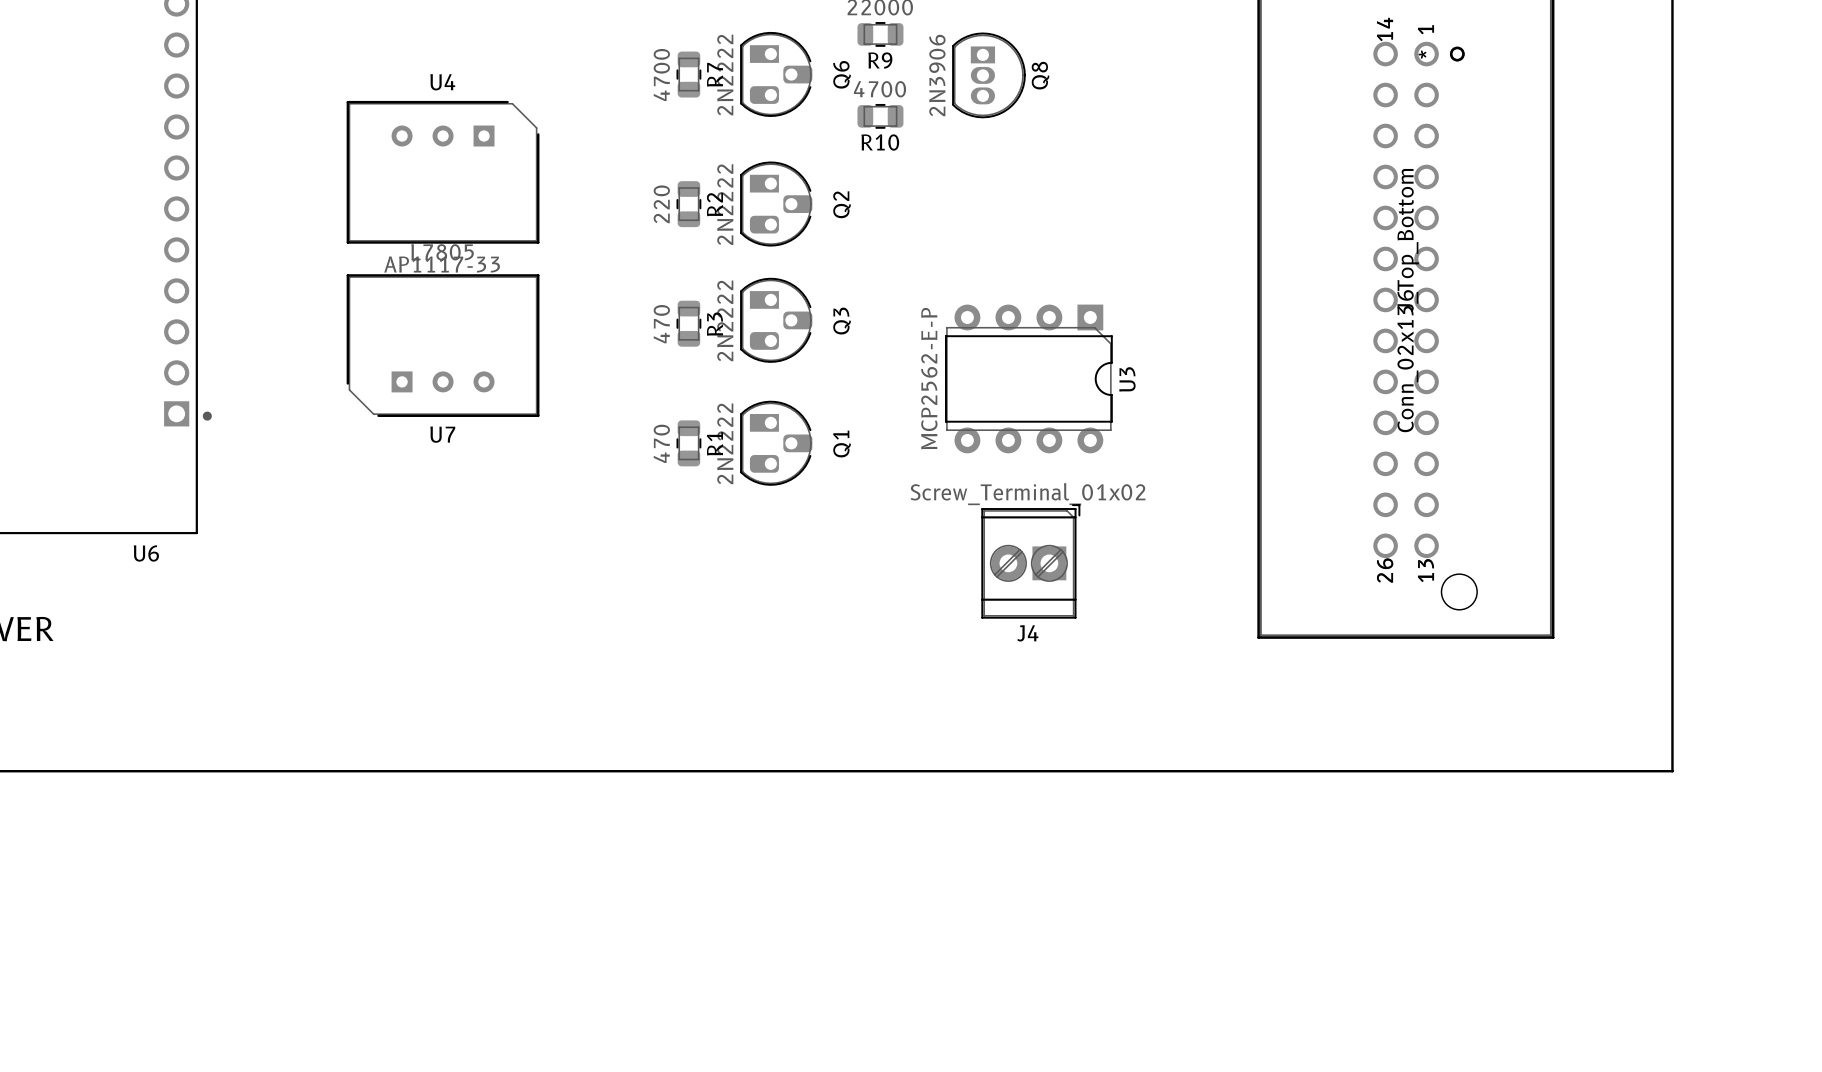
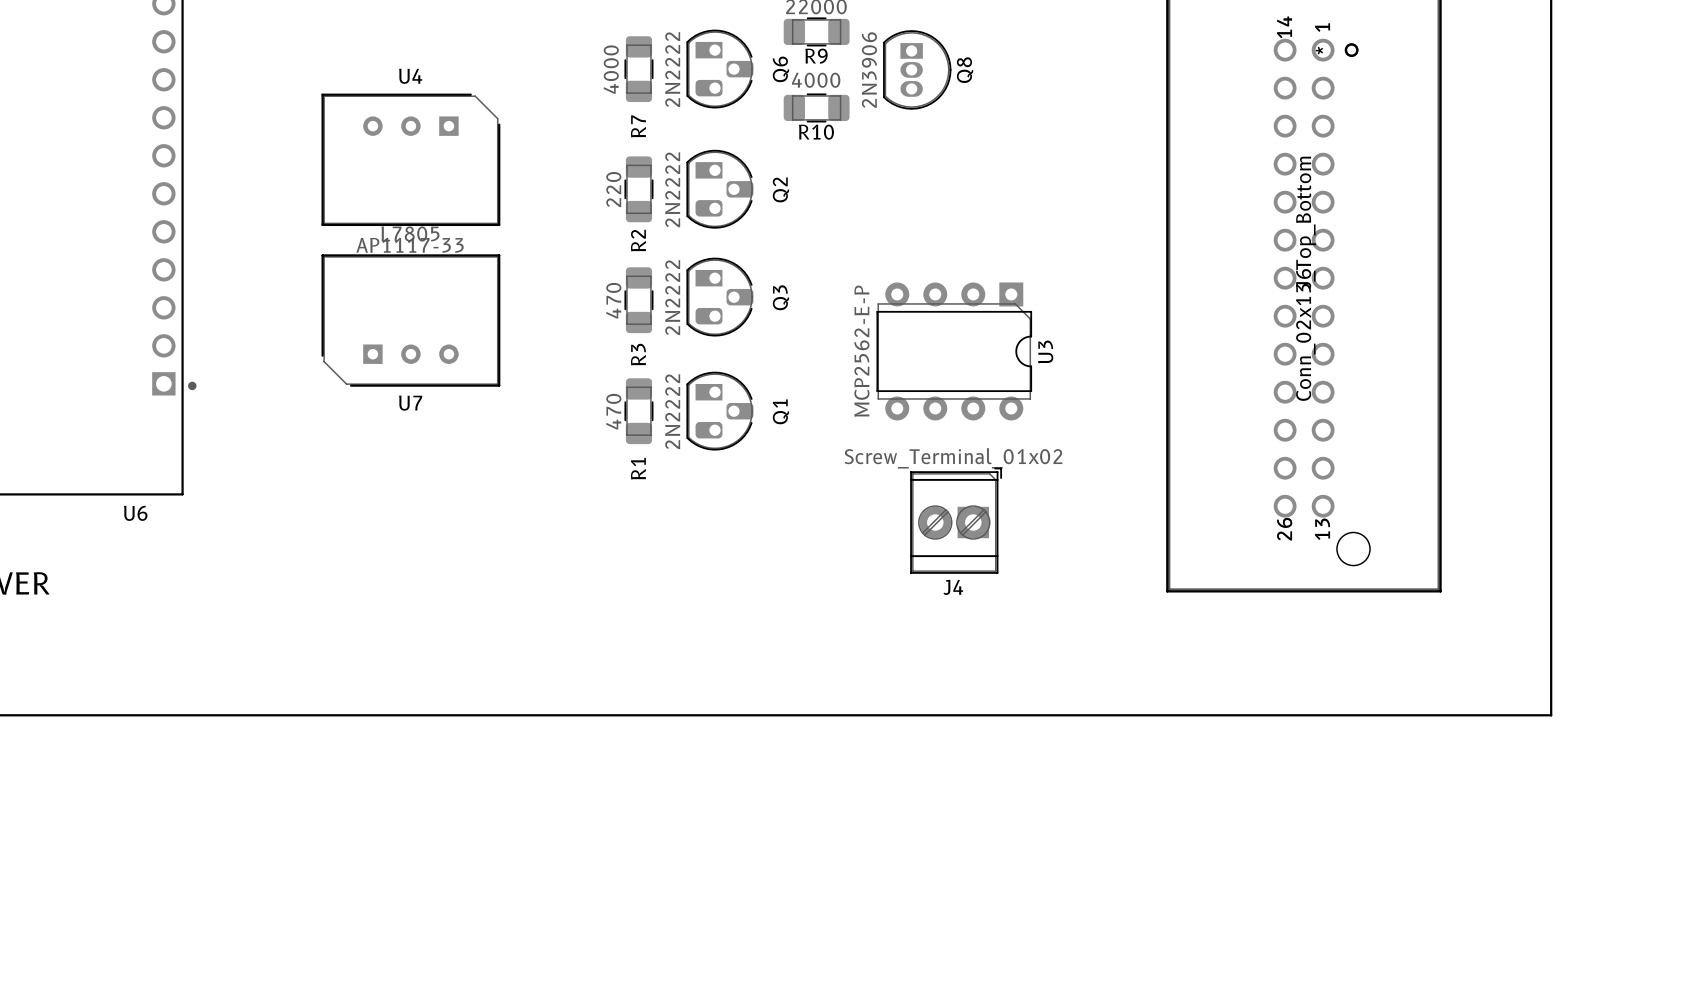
R9 footprint: [857, 22, 904, 47] -> [783, 17, 850, 47]
R7 footprint: [676, 51, 702, 98] -> [624, 36, 654, 103]
R7 name position: R7 (714, 74) -> R7 (638, 126)
R7 value: 4700 (661, 75) -> 4000 (611, 69)
R10 value: 4700 (879, 89) -> 4000 (816, 80)
R10 footprint: [857, 103, 904, 129] -> [783, 93, 850, 123]
R2 footprint: [676, 181, 702, 228] -> [624, 156, 654, 223]
R2 name position: R2 (714, 204) -> R2 (638, 240)
R3 footprint: [676, 300, 702, 347] -> [624, 267, 654, 334]
R3 name position: R3 (714, 324) -> R3 (638, 354)
R1 footprint: [676, 420, 702, 467] -> [624, 378, 654, 445]
R1 name position: R1 (714, 443) -> R1 (638, 468)

